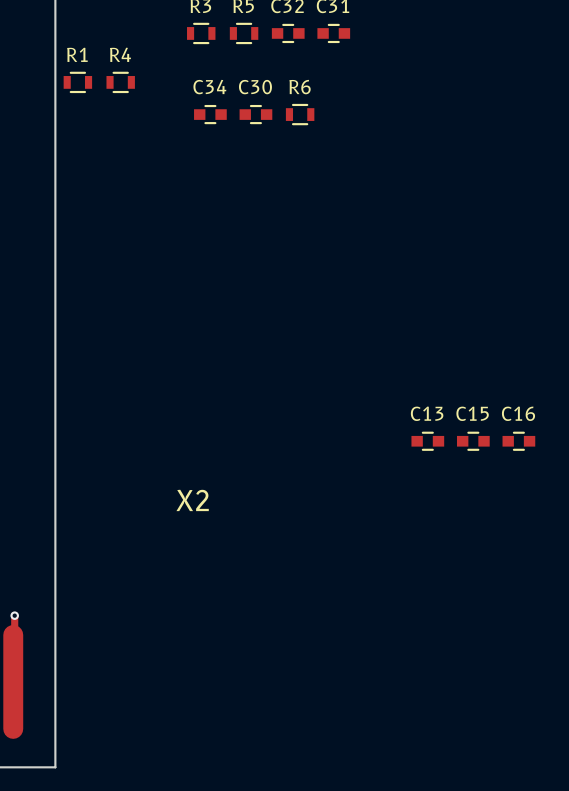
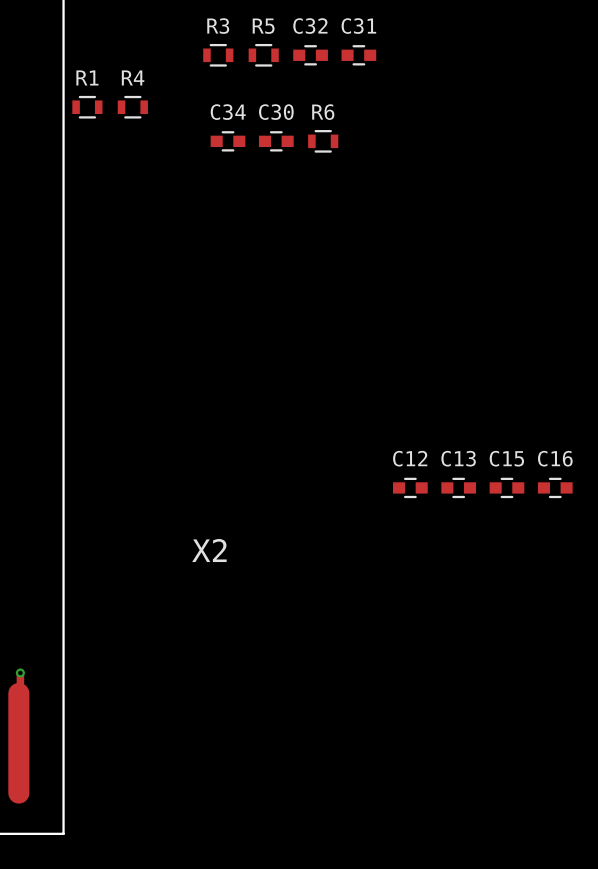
C12: none -> (410, 487)

